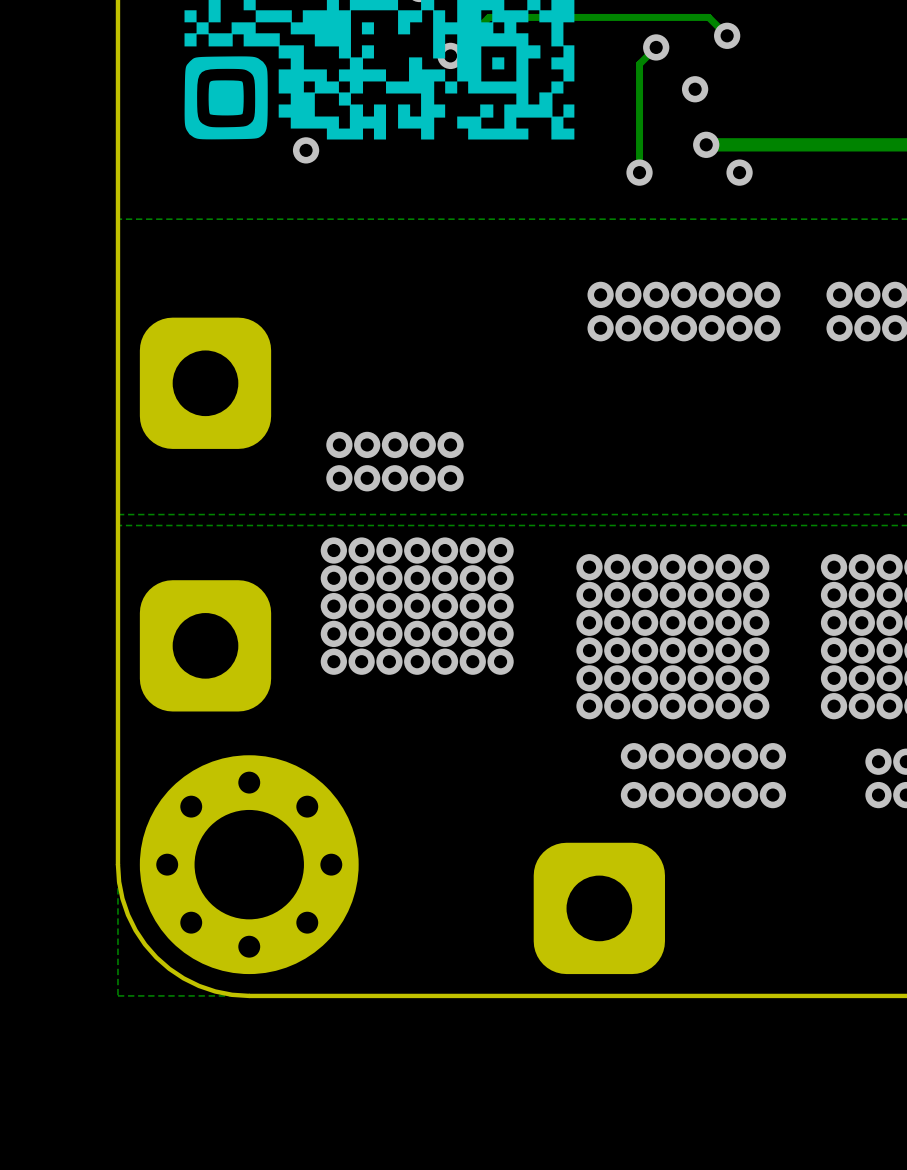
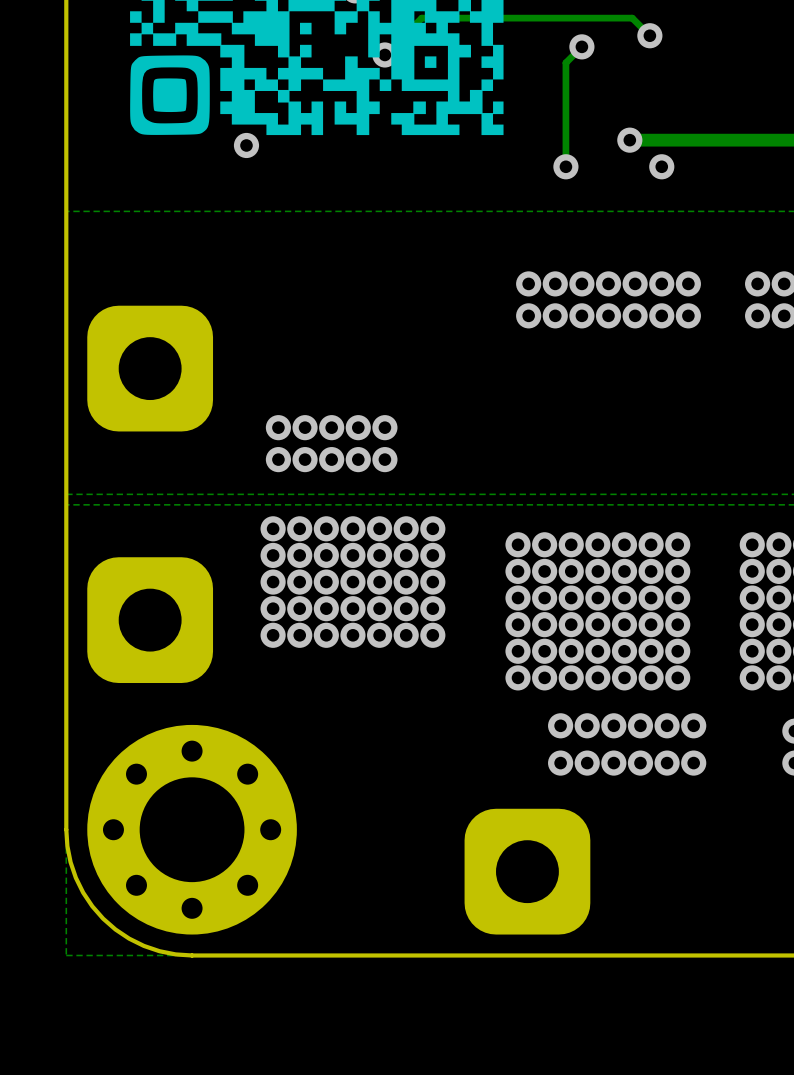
via: (695, 89) -> none

